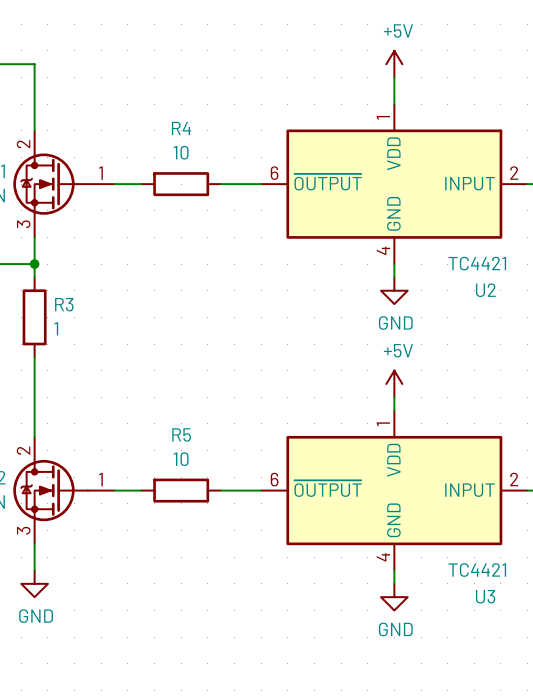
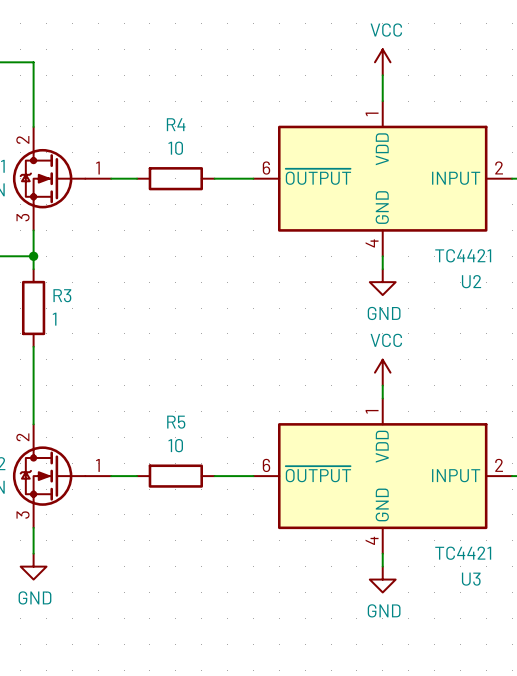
power symbol: +5V (394, 64) -> VCC (382, 62)
power symbol: +5V (394, 383) -> VCC (382, 372)

